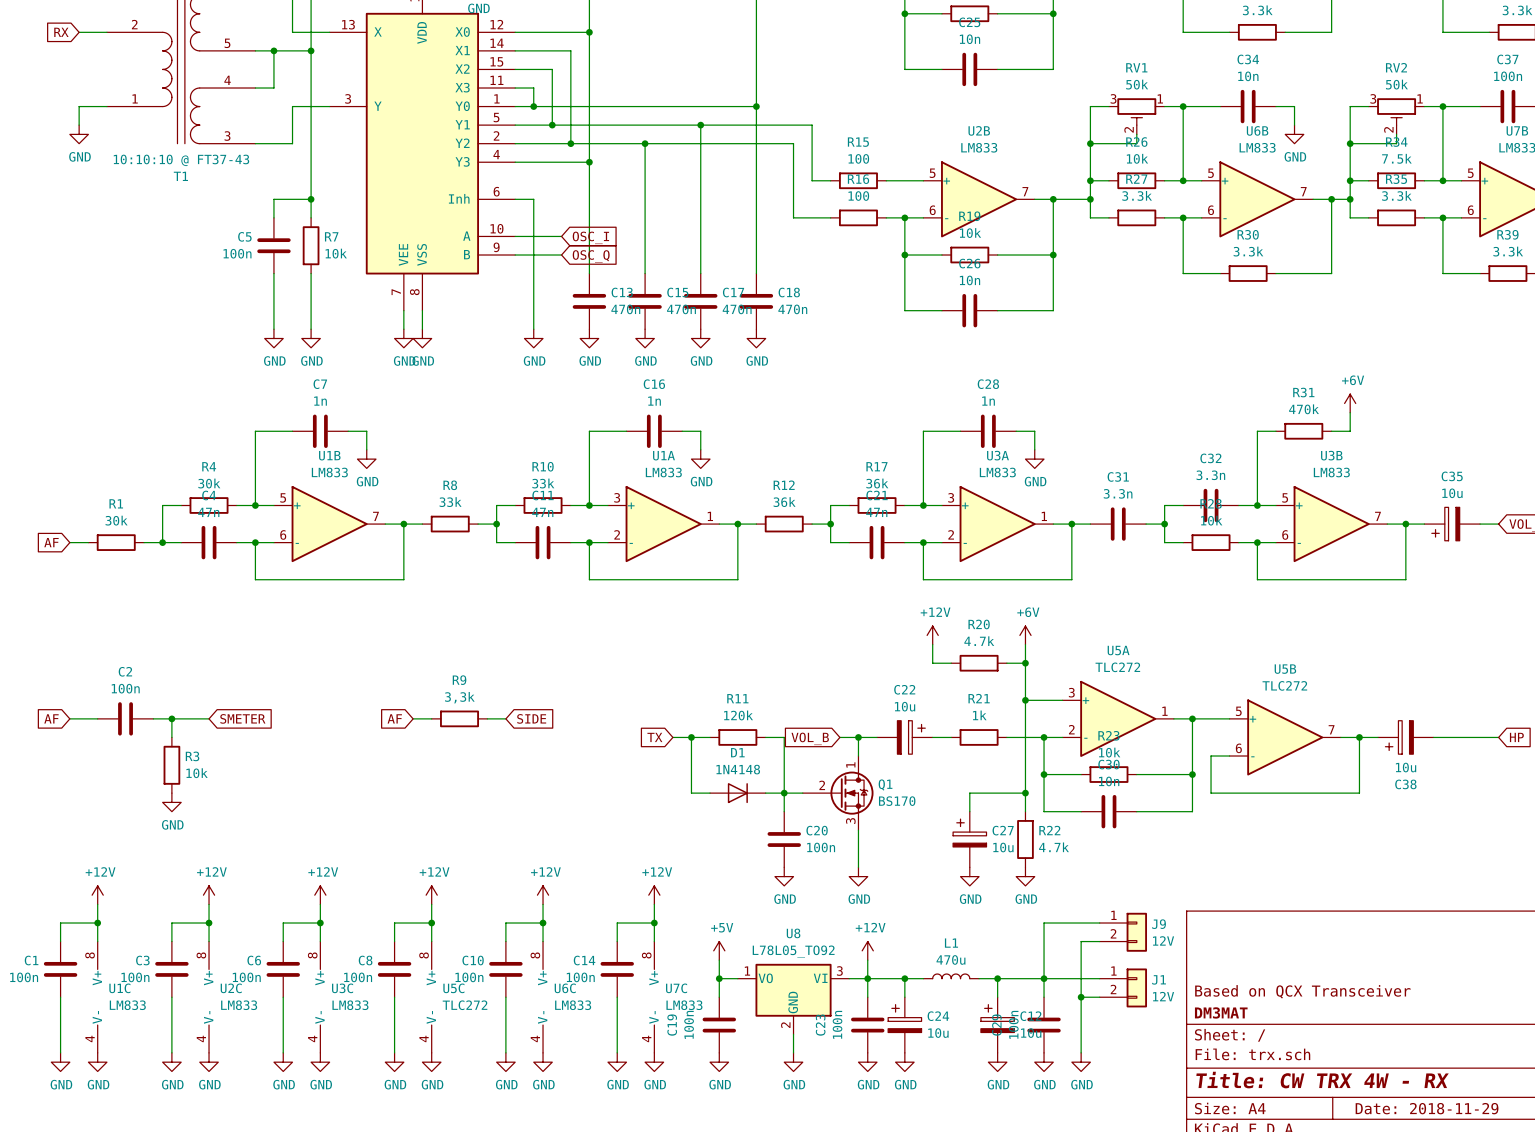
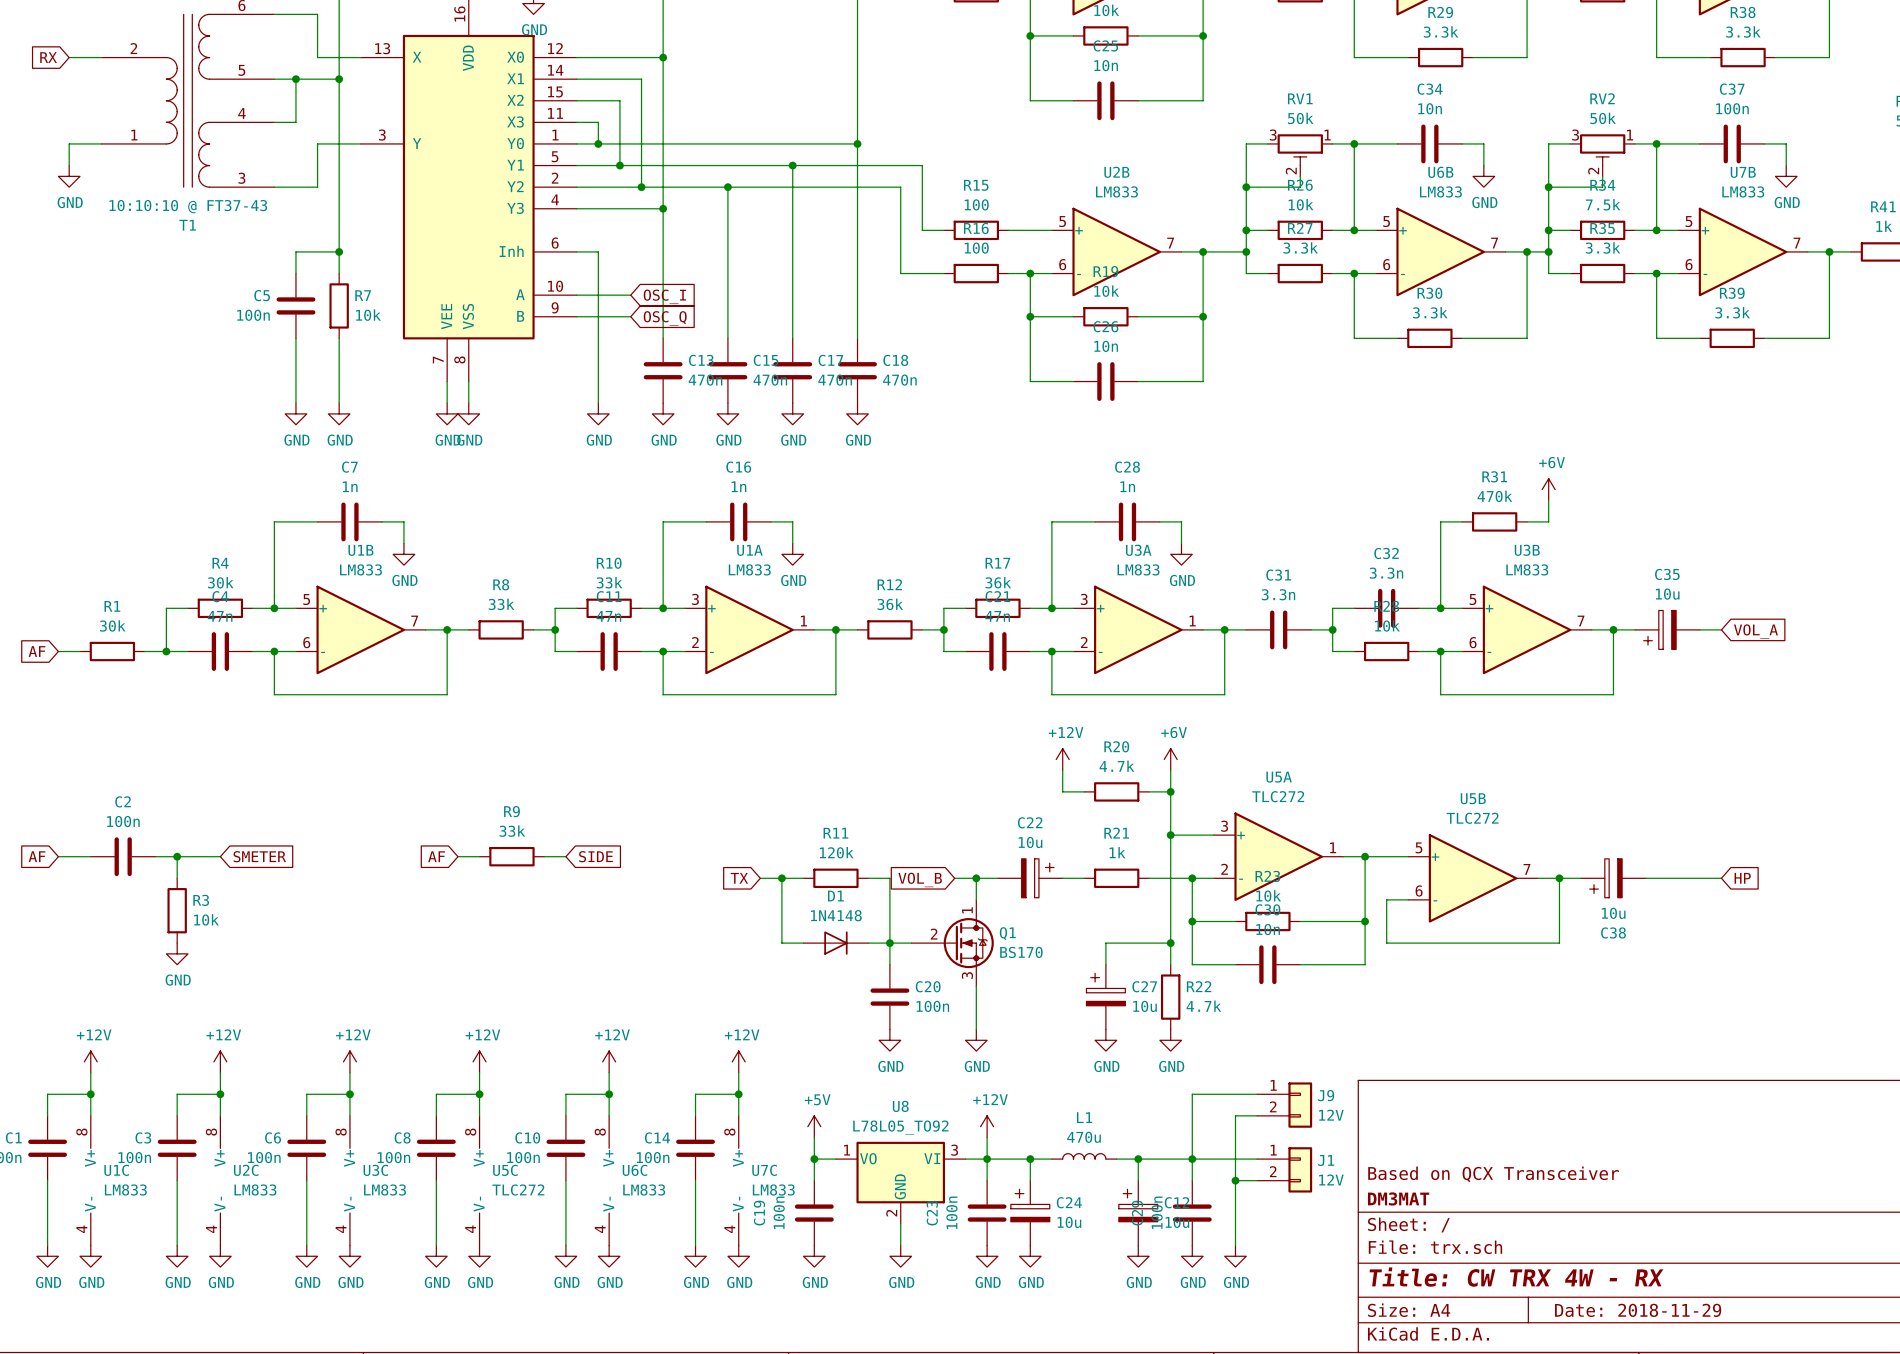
R9 value: 3,3k (459, 697) -> 33k (512, 831)

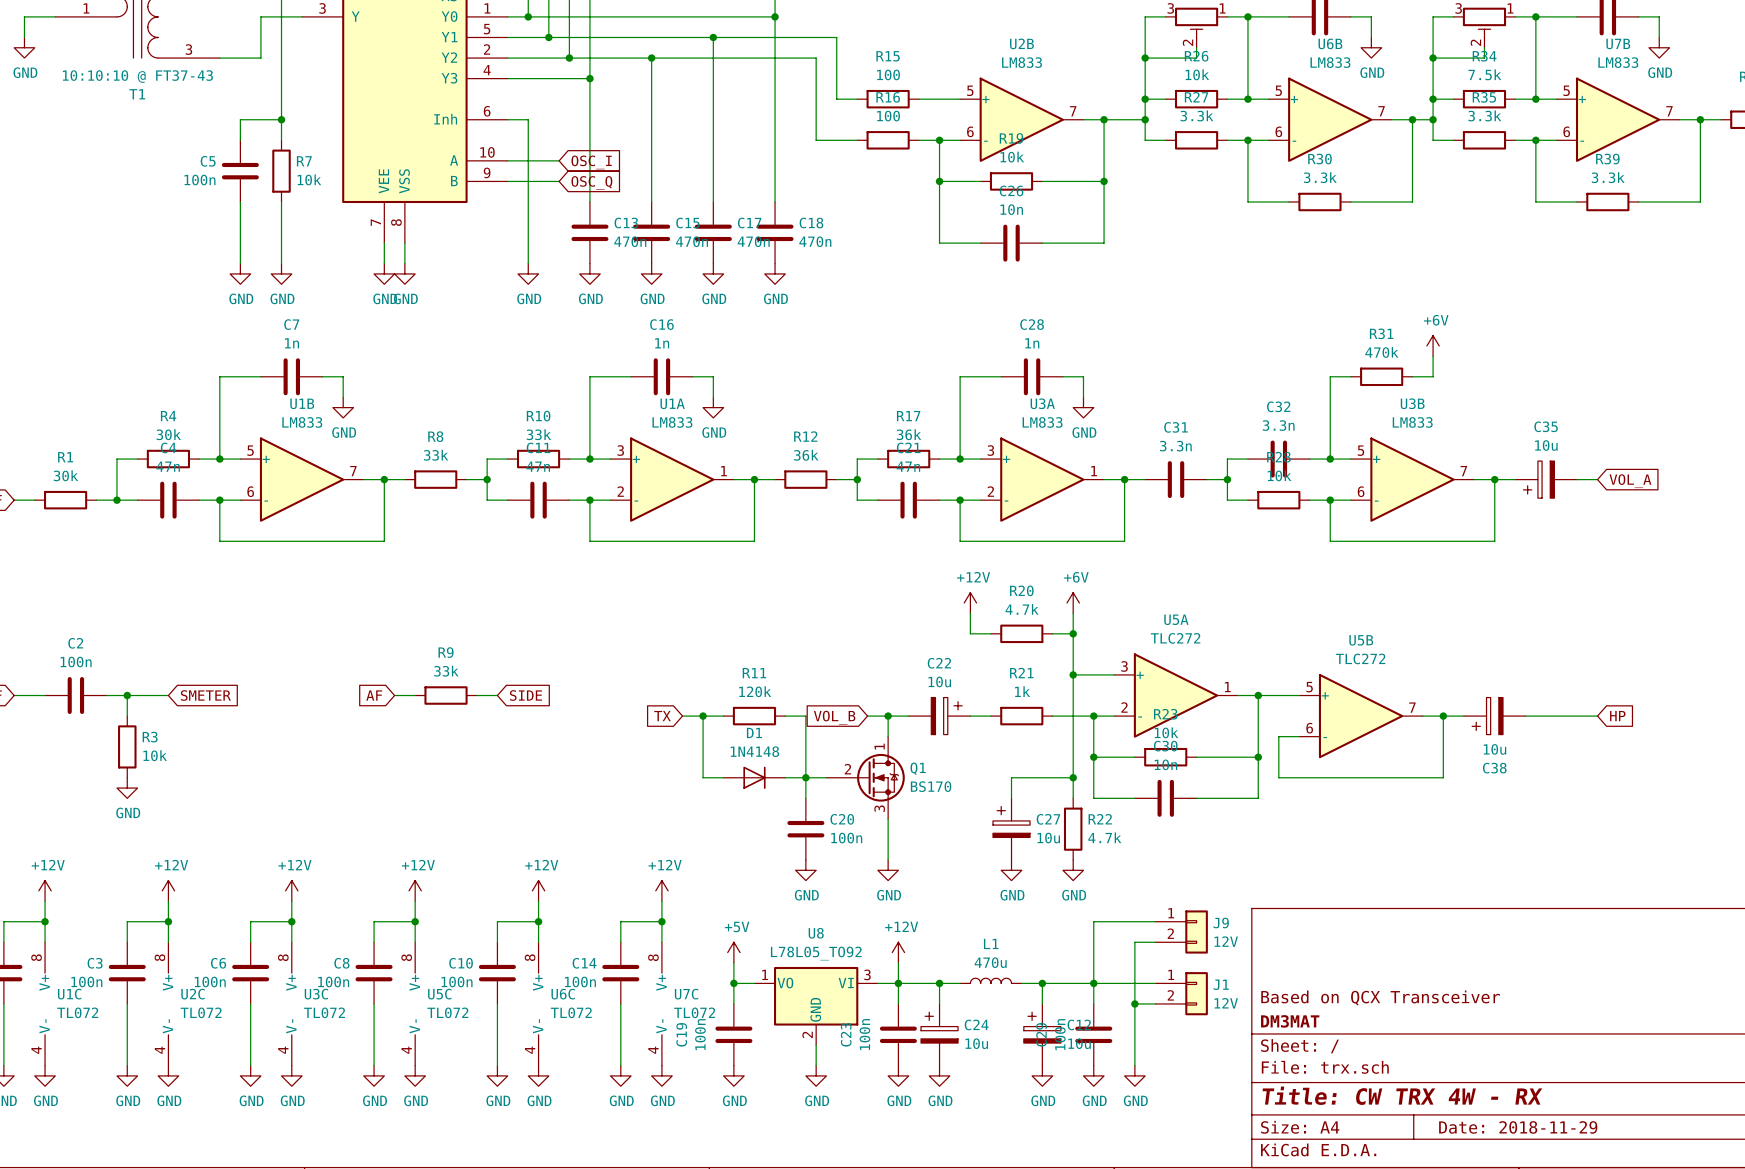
U1C value: LM833 (125, 1190) -> TL072 (77, 1012)
U2C value: LM833 (255, 1190) -> TL072 (201, 1012)
U3C value: LM833 (385, 1190) -> TL072 (324, 1012)
U5C value: TLC272 (518, 1190) -> TL072 (447, 1012)
U6C value: LM833 (644, 1190) -> TL072 (571, 1012)
U7C value: LM833 (773, 1190) -> TL072 (694, 1012)

